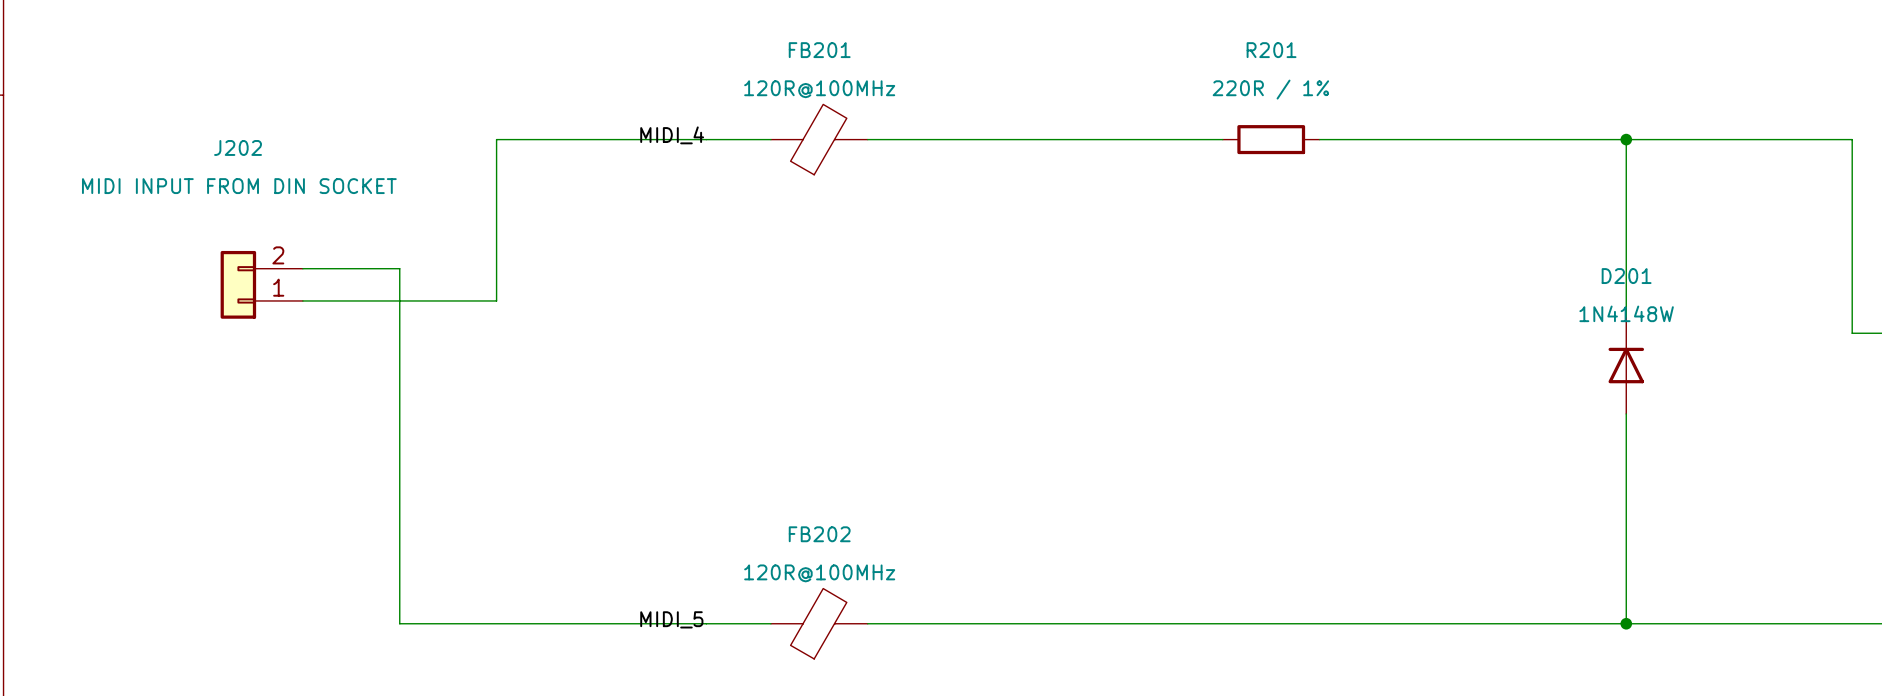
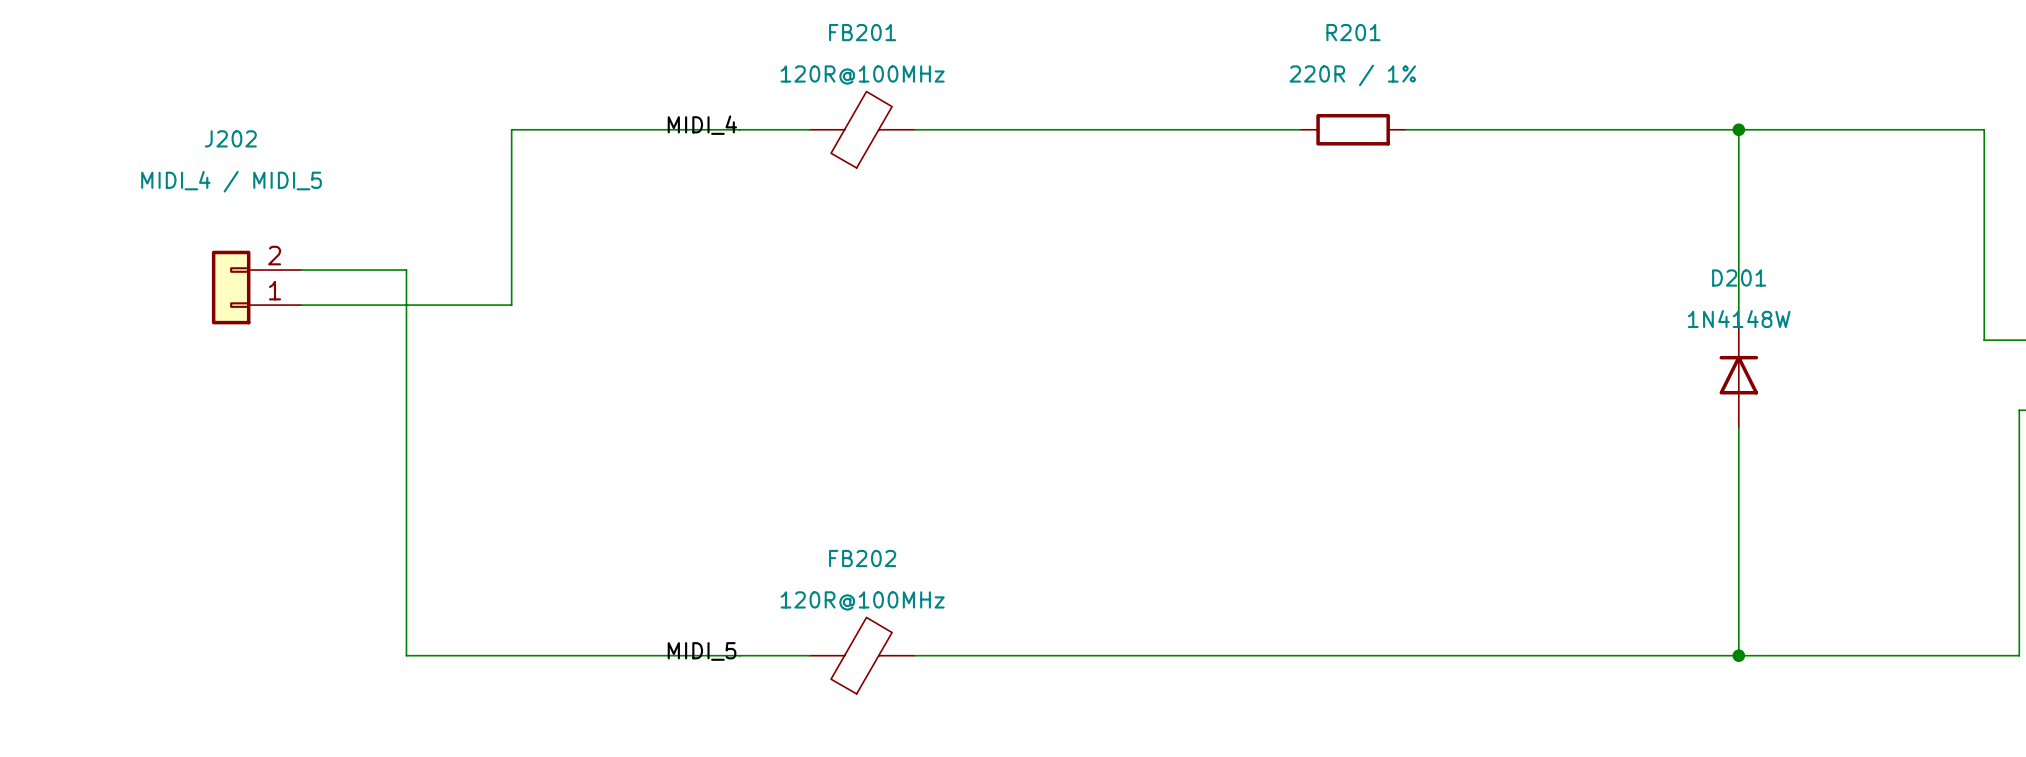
J202 value: MIDI INPUT FROM DIN SOCKET (239, 186) -> MIDI_4 / MIDI_5 (231, 181)

